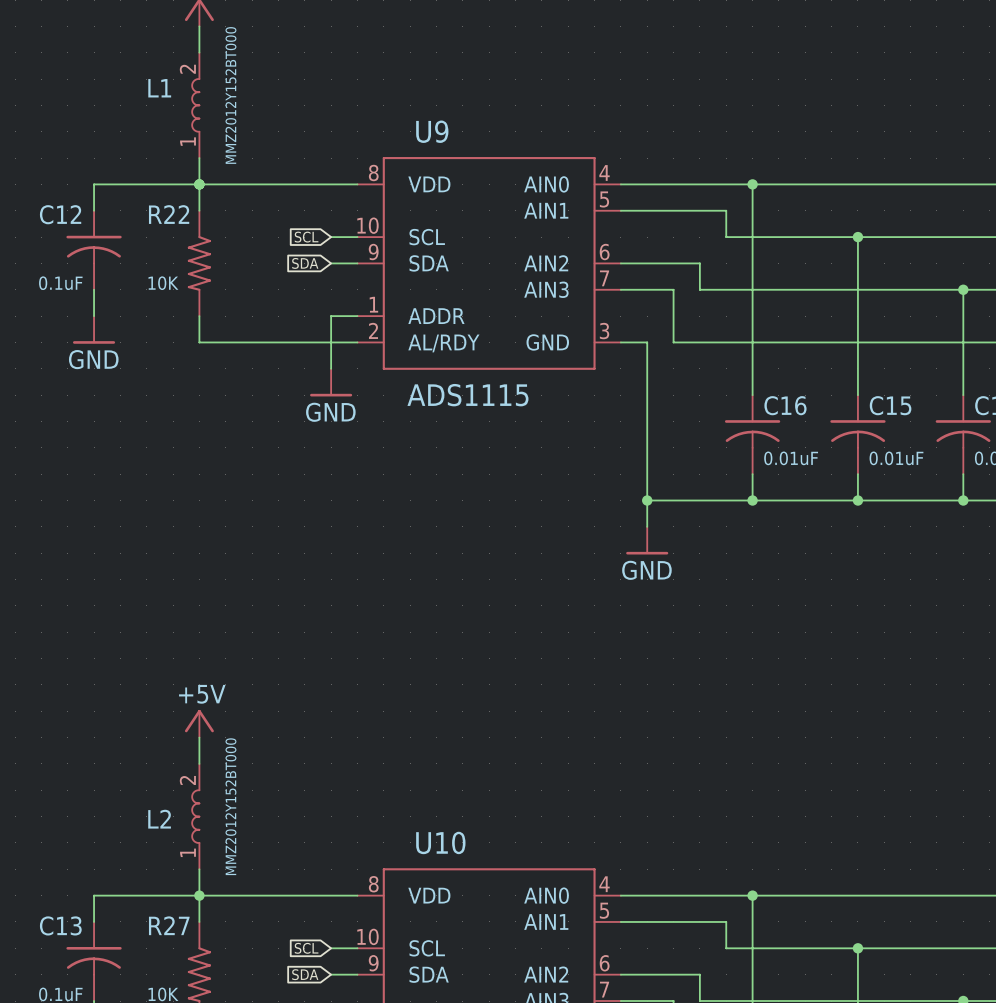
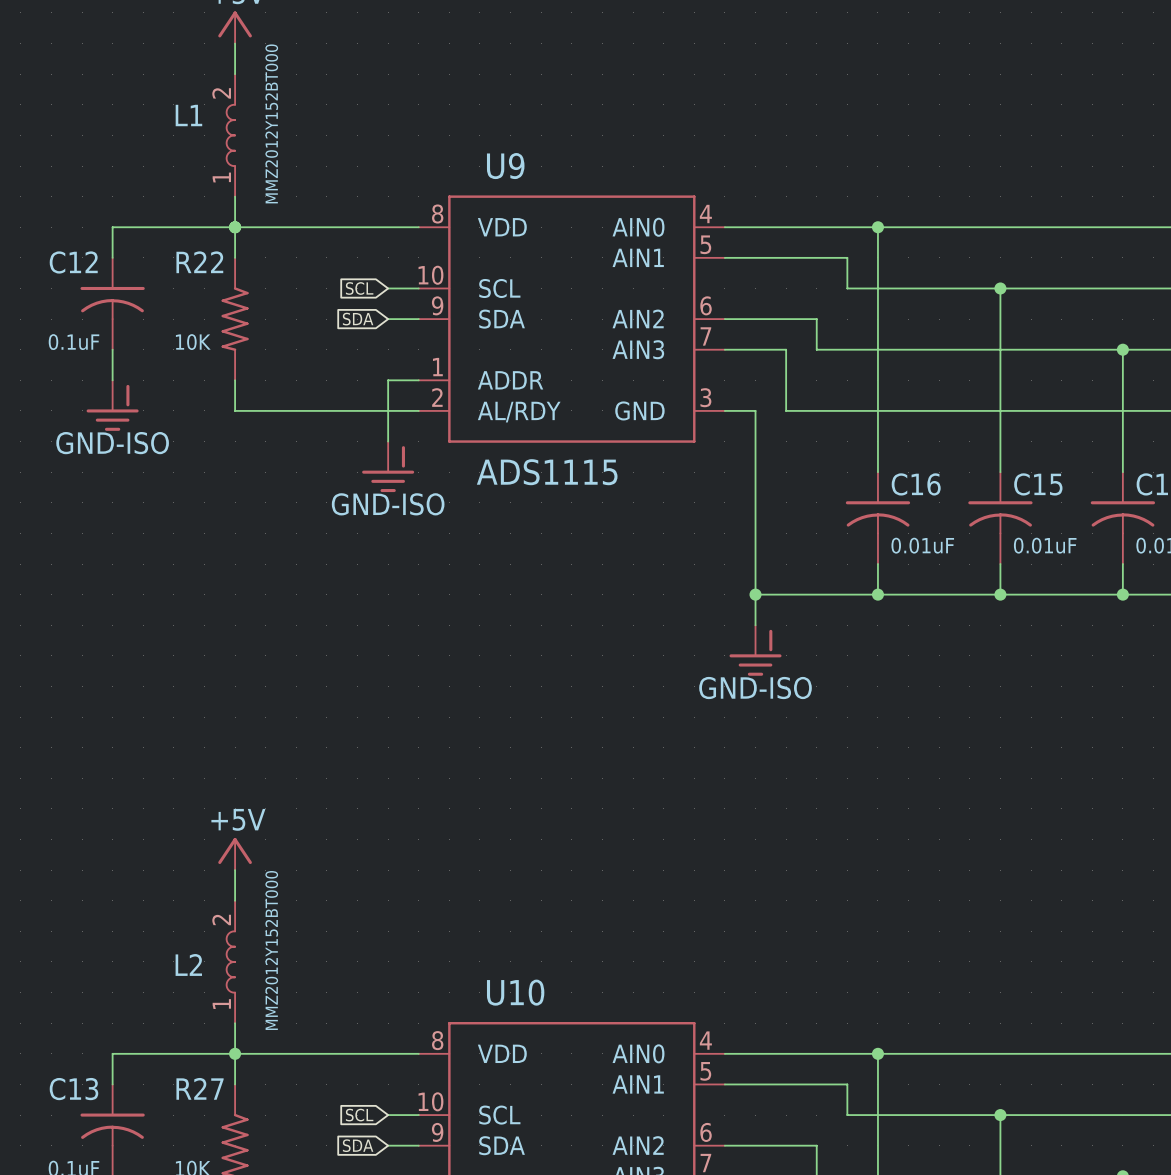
power symbol: GND (94, 329) -> GND-ISO (112, 405)
power symbol: GND (331, 382) -> GND-ISO (388, 466)
power symbol: GND (647, 540) -> GND-ISO (755, 650)

